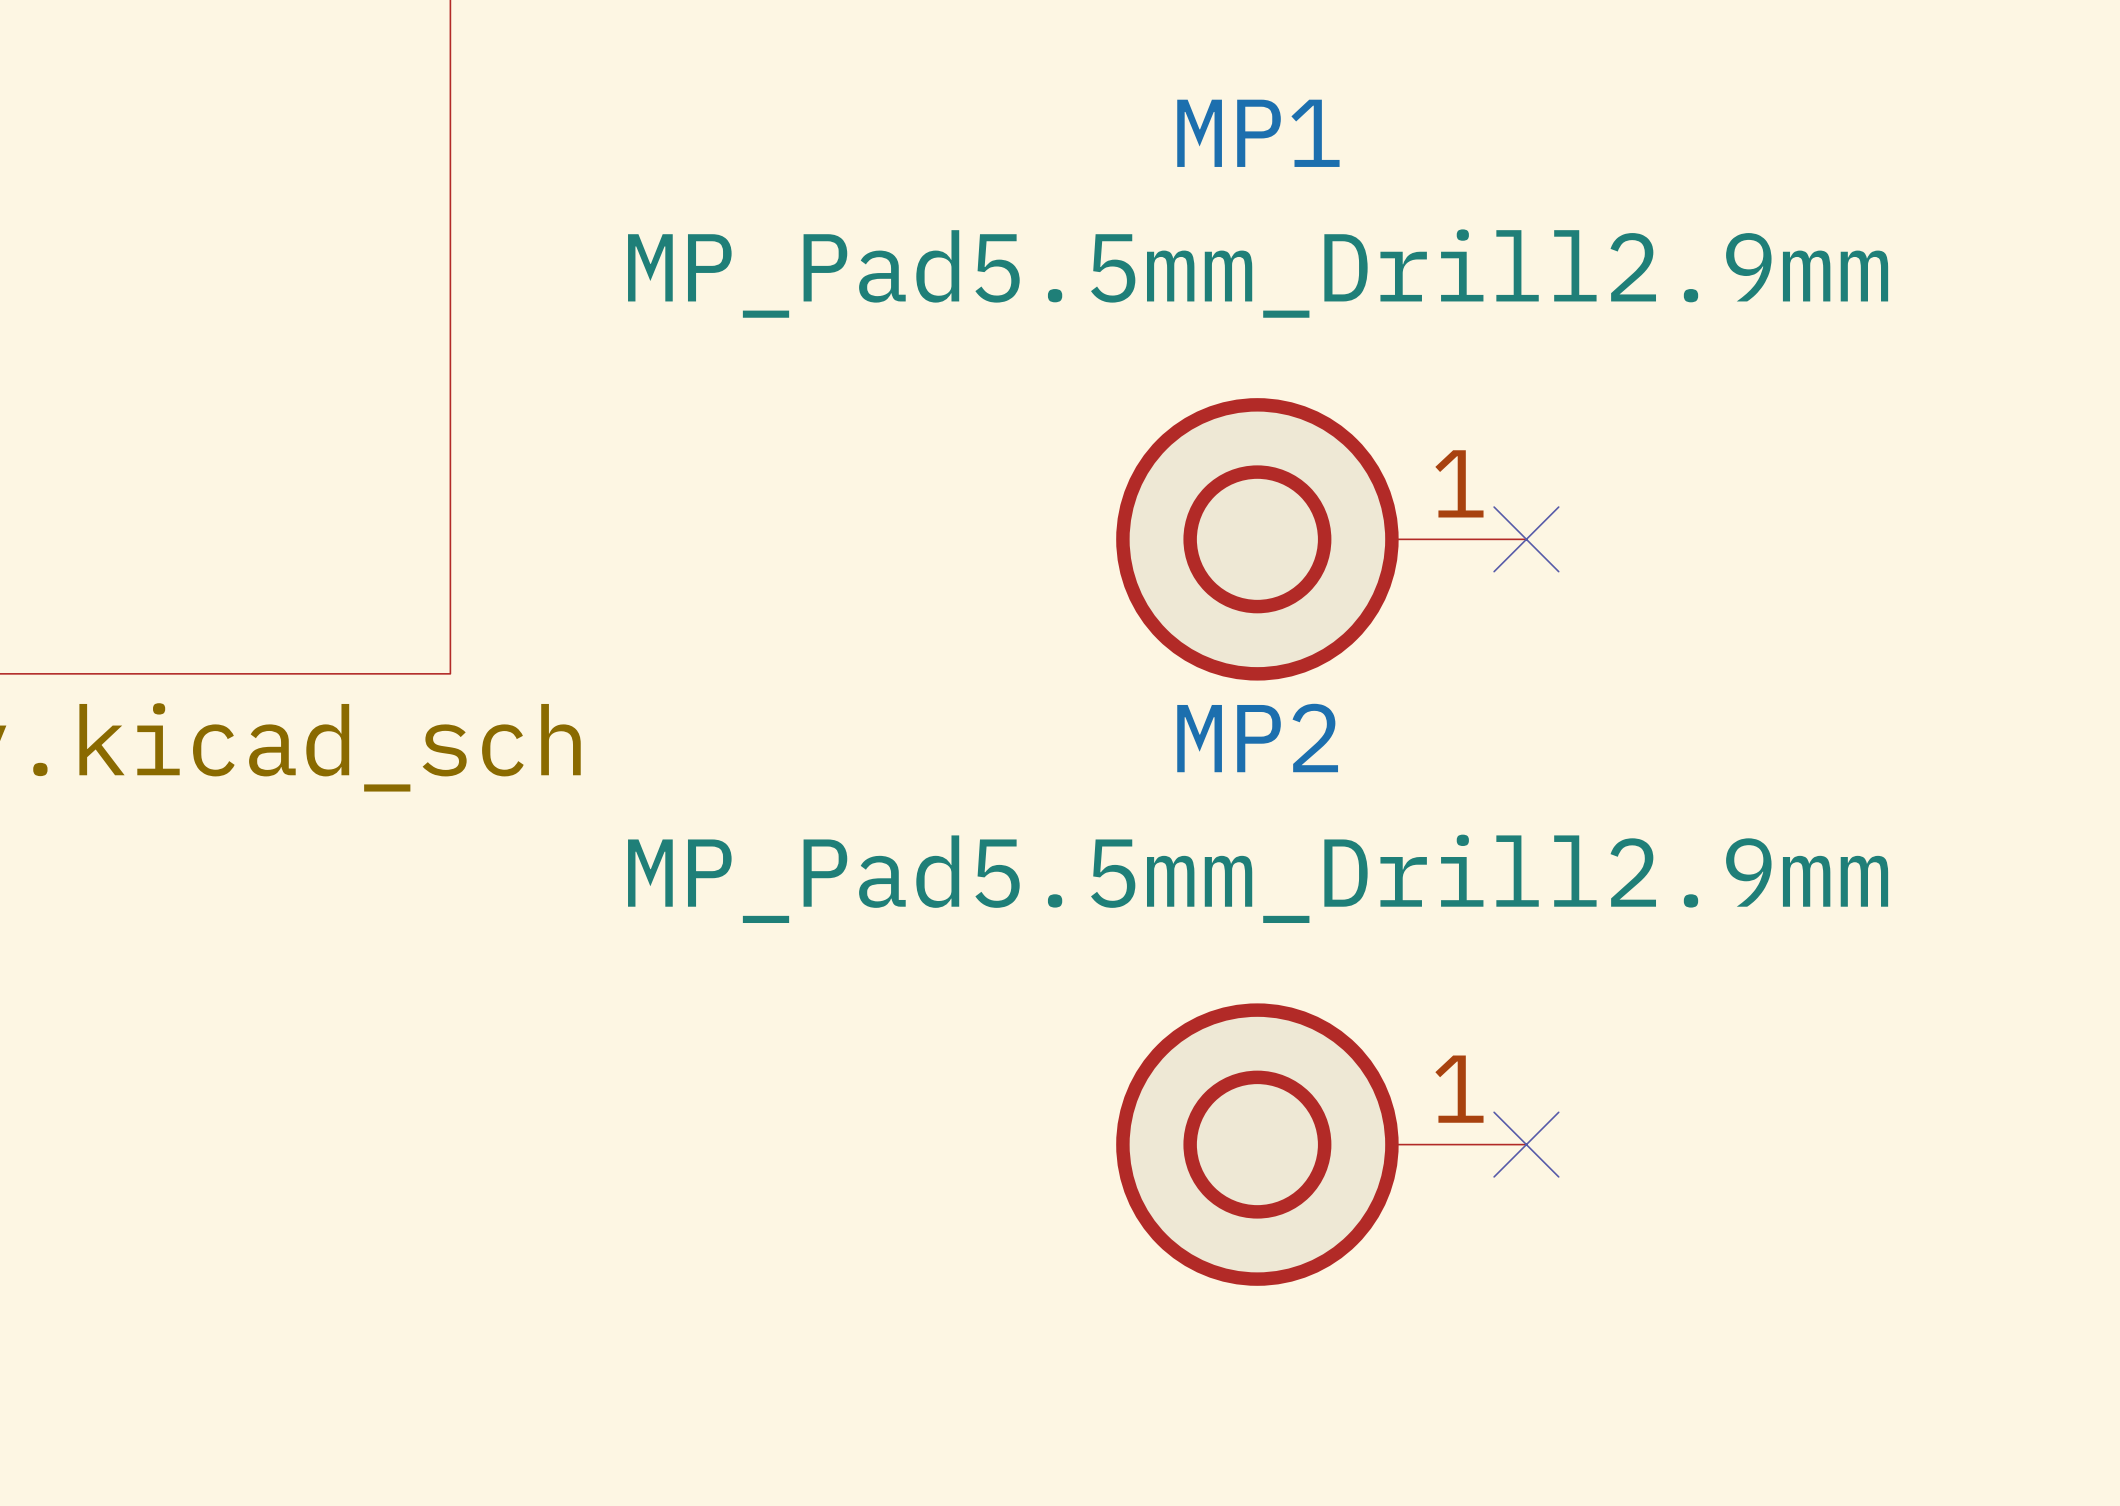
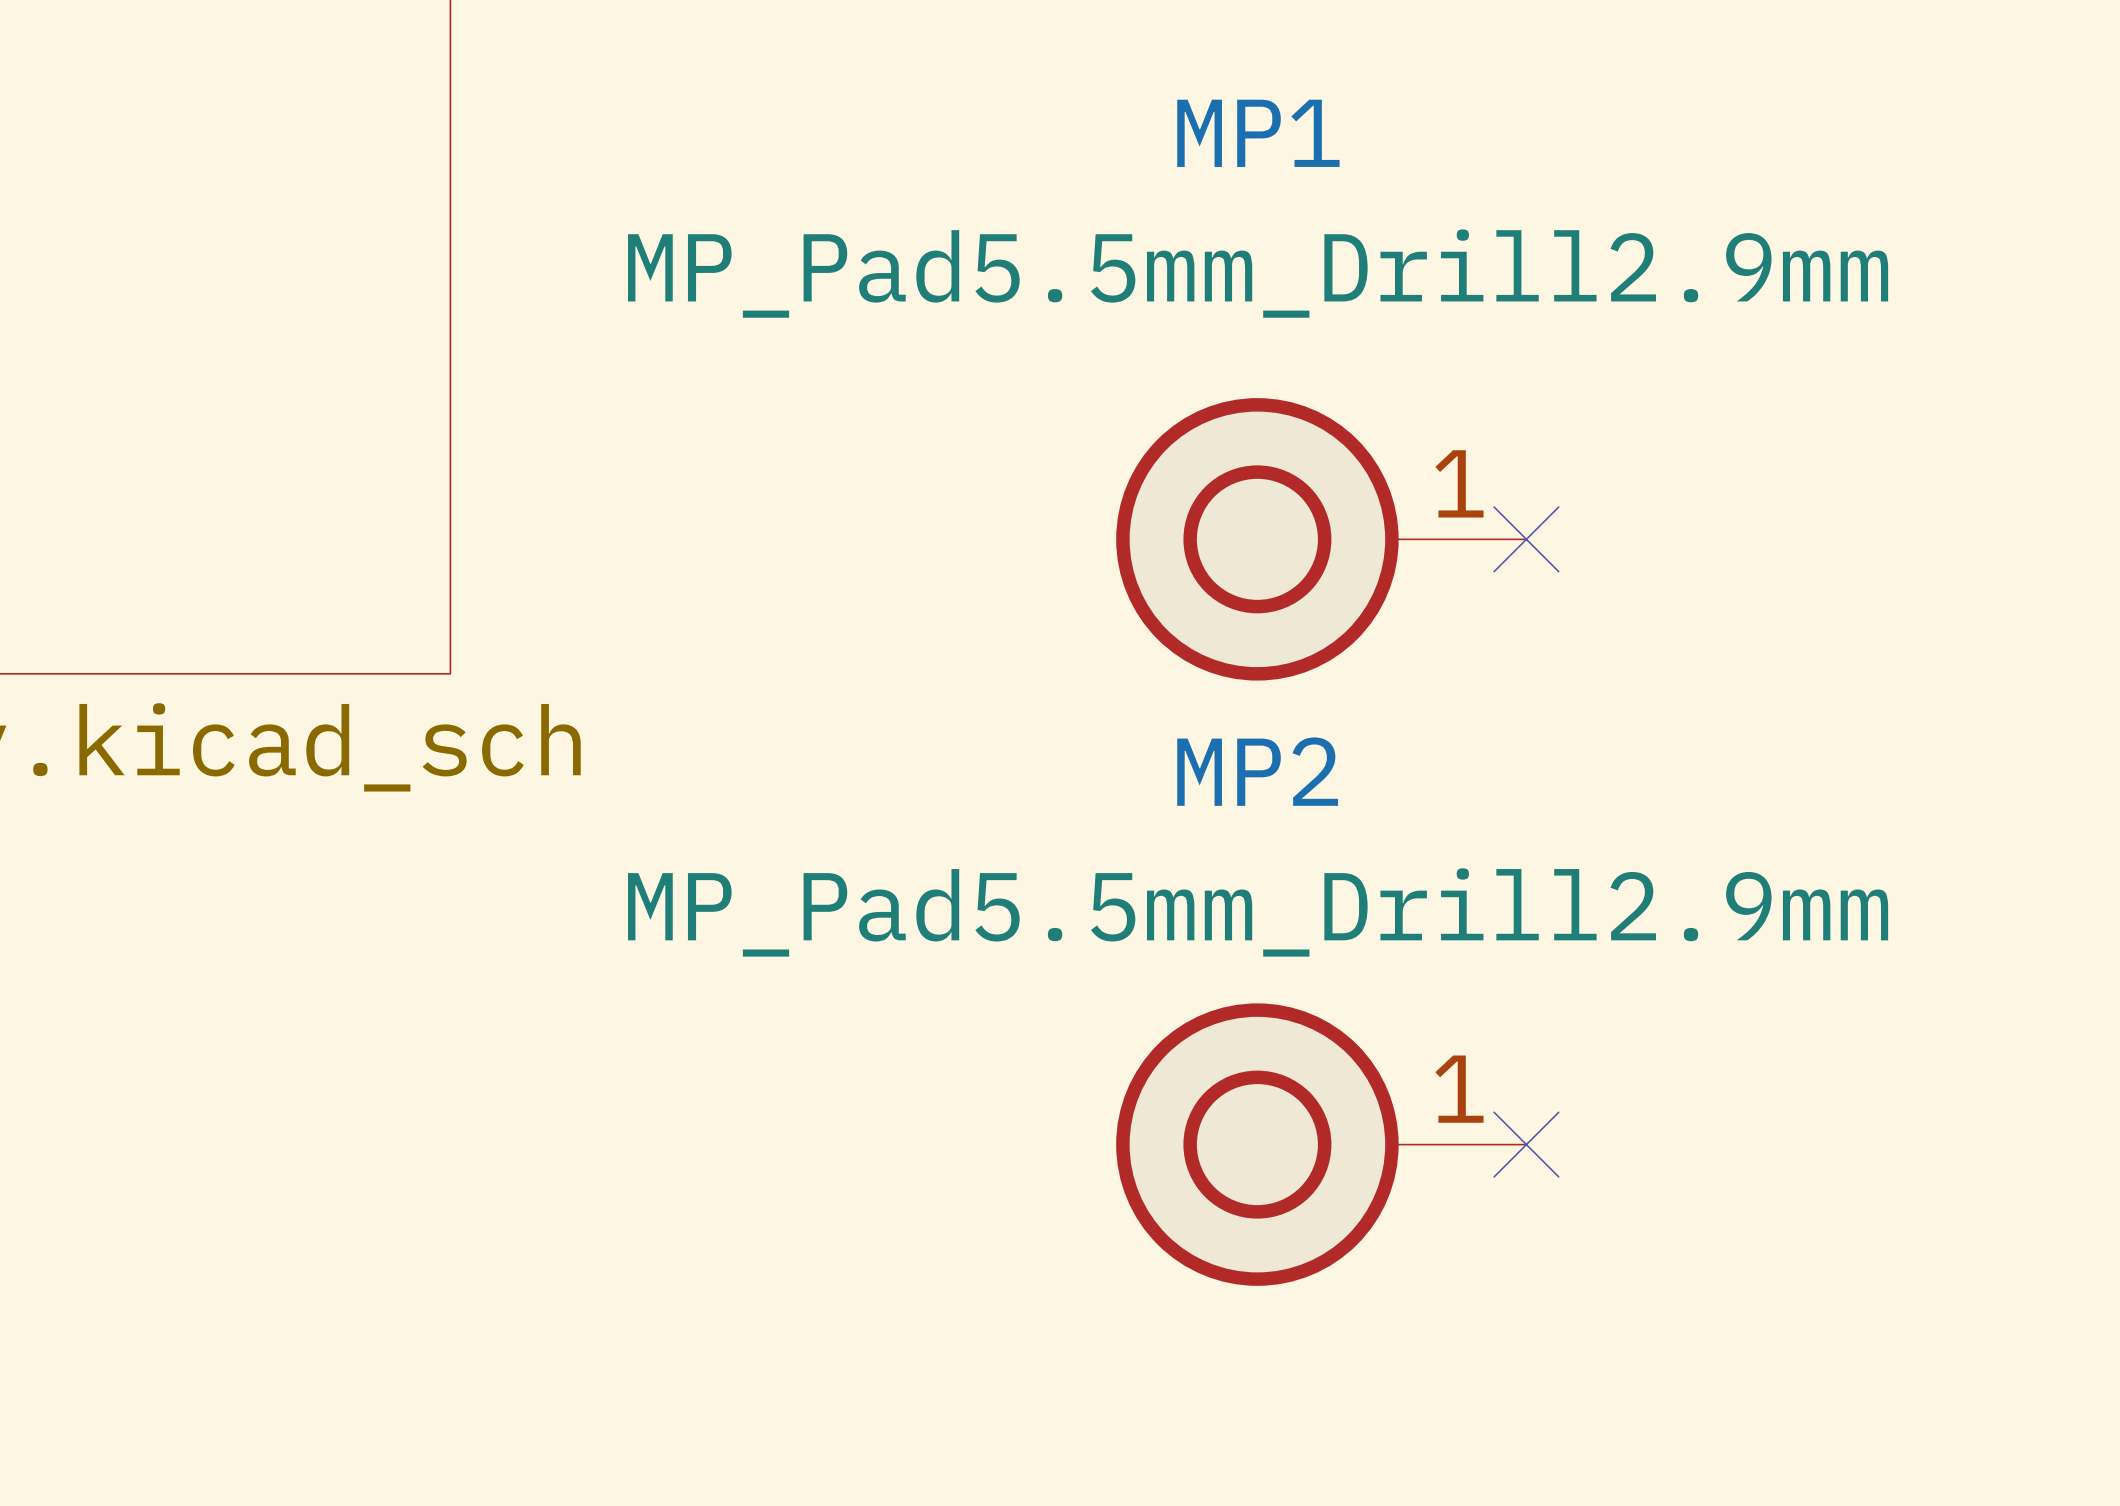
MP2 name position: MP2 (1257, 738) -> MP2 (1257, 771)
MP2 value position: MP_Pad5.5mm_Drill2.9mm (1258, 878) -> MP_Pad5.5mm_Drill2.9mm (1258, 912)

